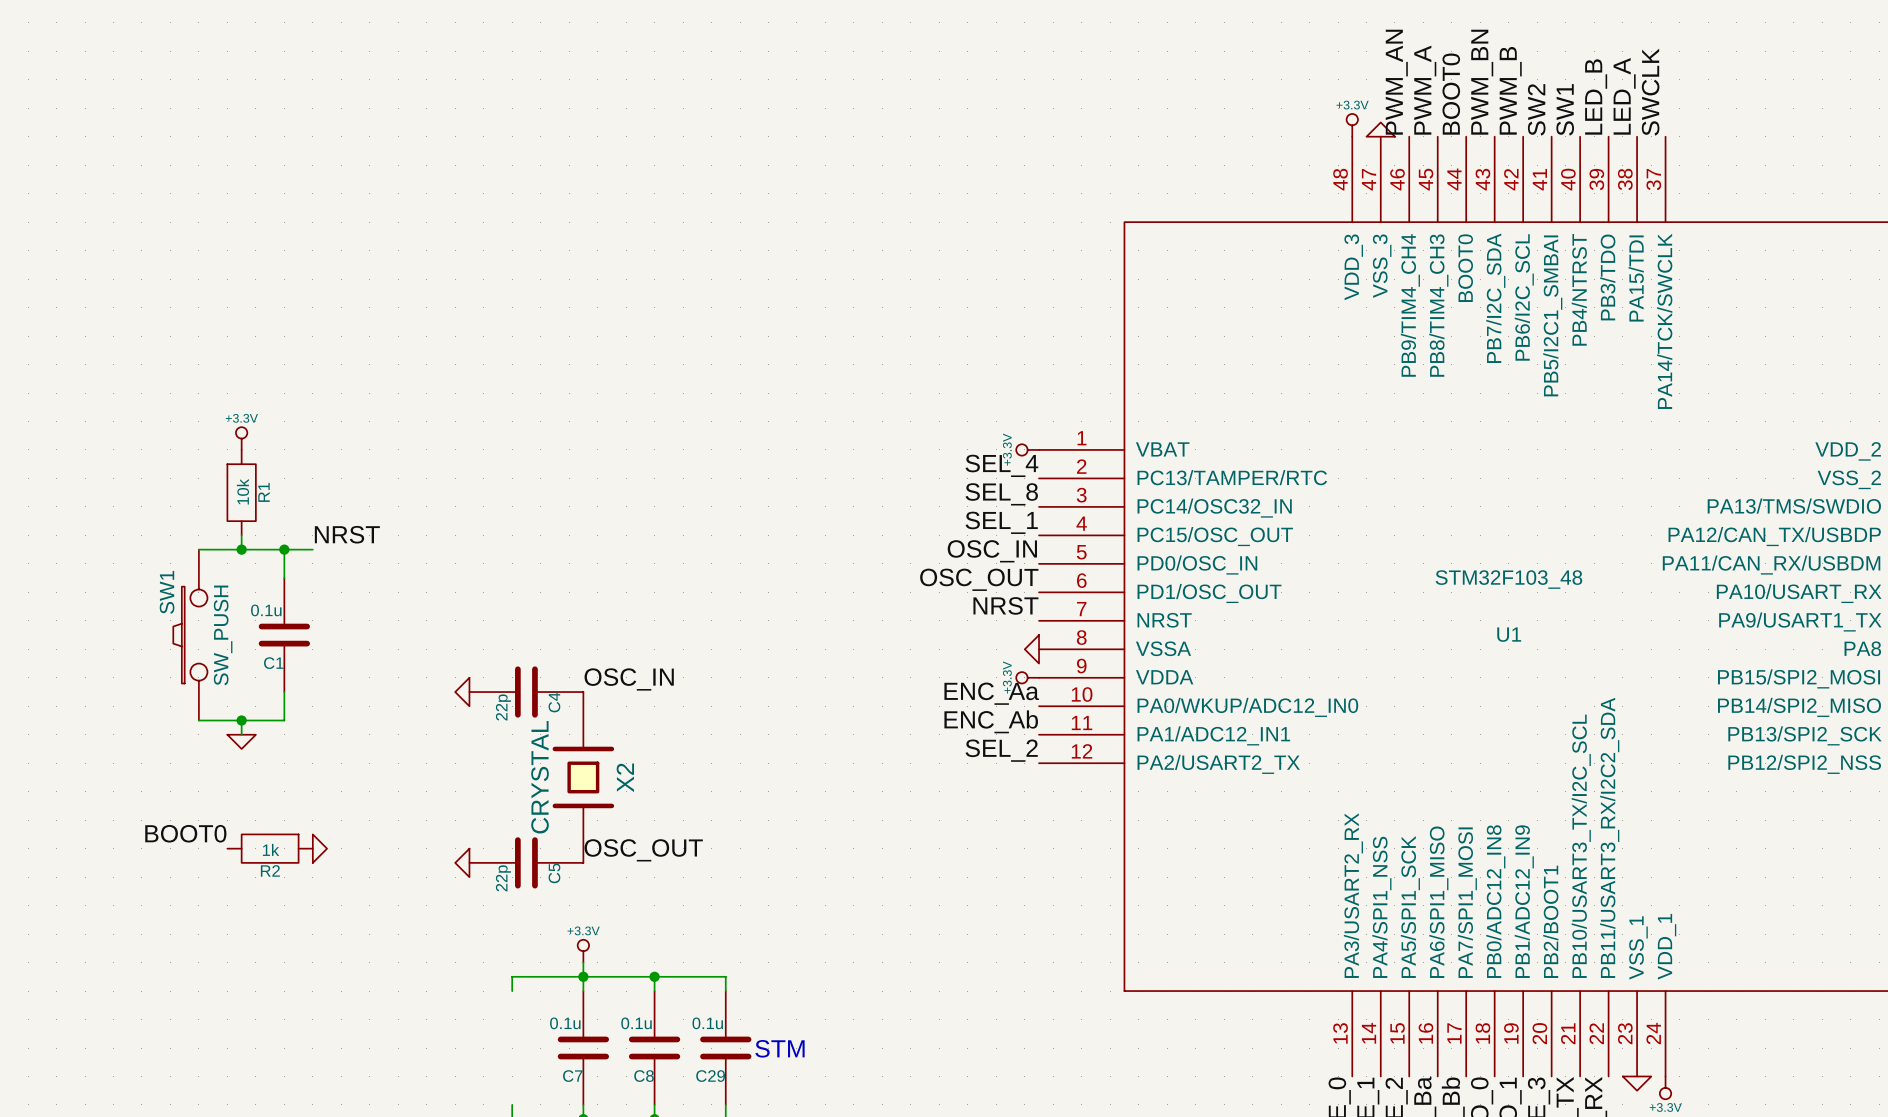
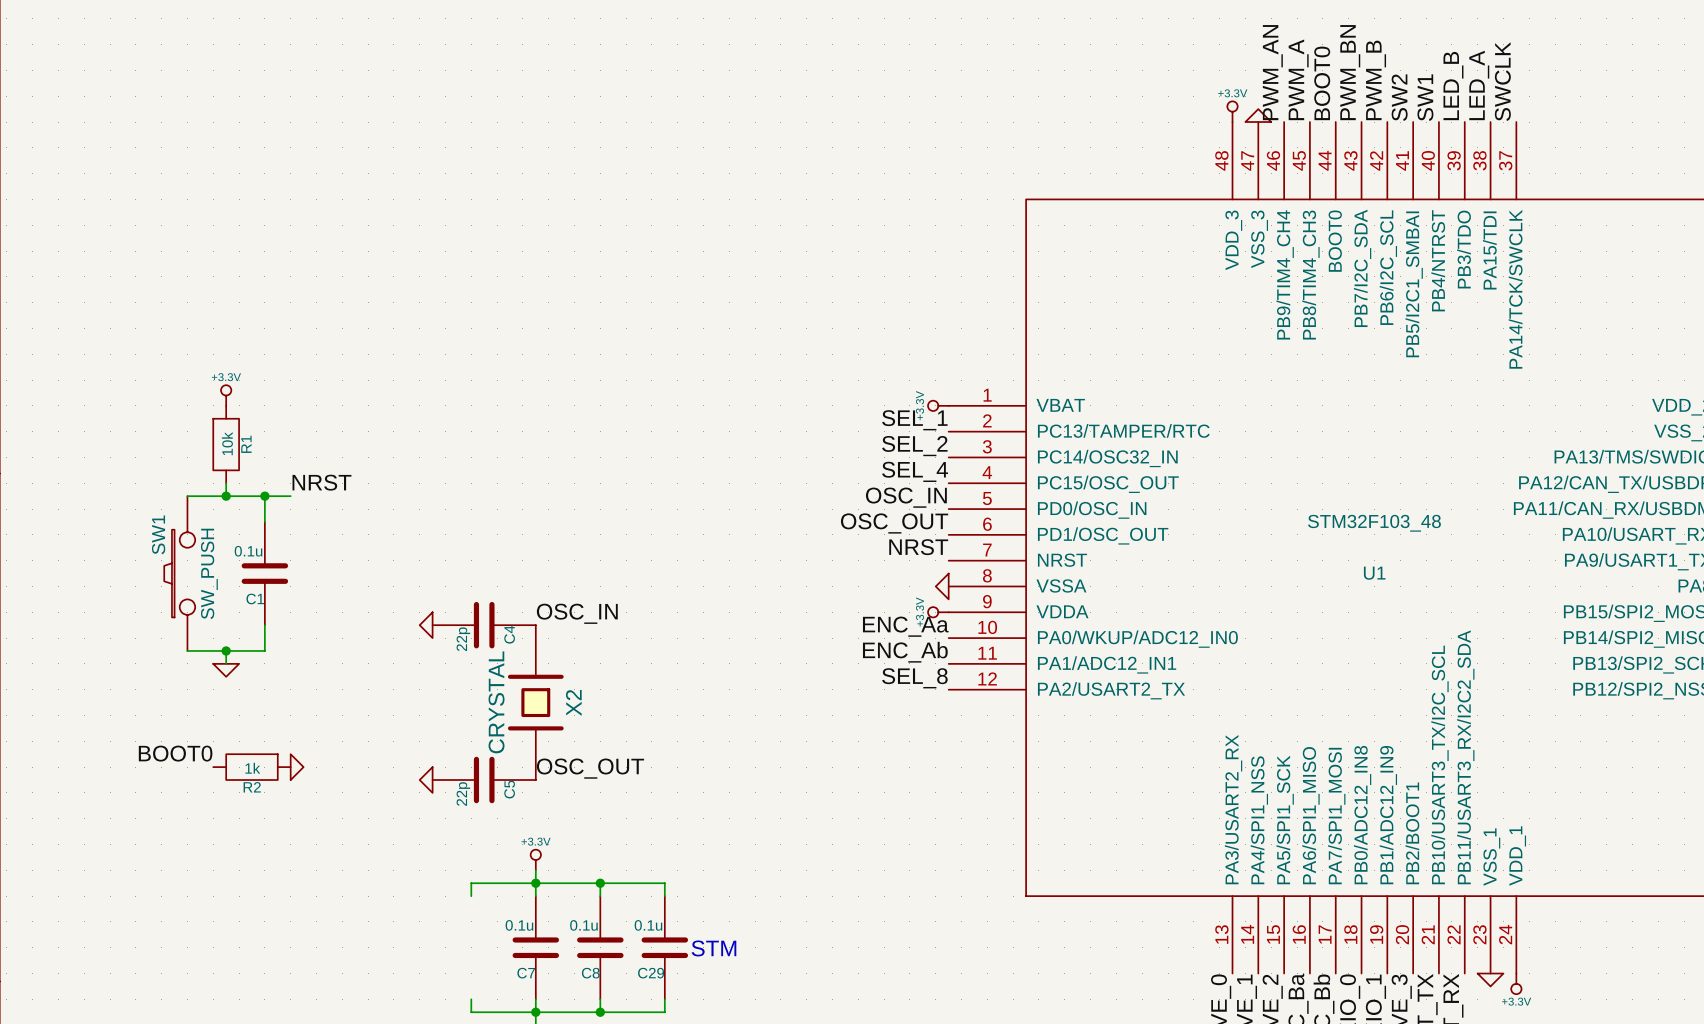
label: SEL_4 (1001, 465) -> SEL_1 (914, 420)
label: SEL_8 (1001, 494) -> SEL_2 (914, 446)
label: SEL_1 (1001, 522) -> SEL_4 (915, 471)
label: SEL_2 (1001, 750) -> SEL_8 (914, 678)

